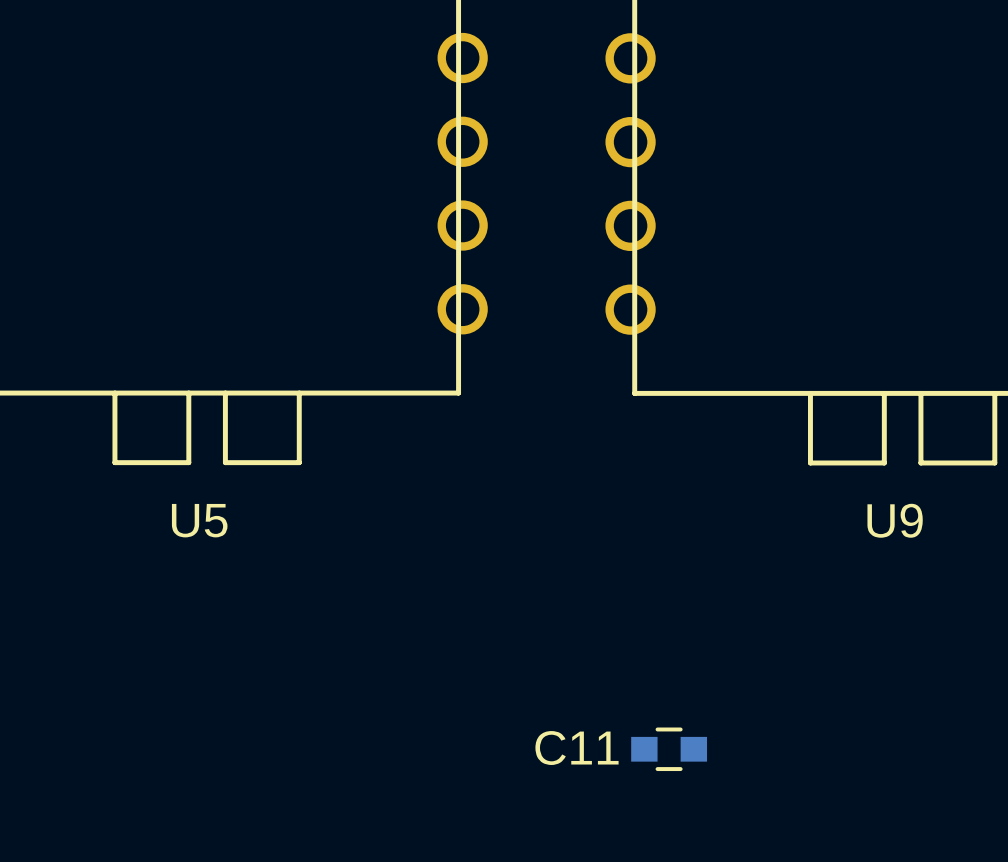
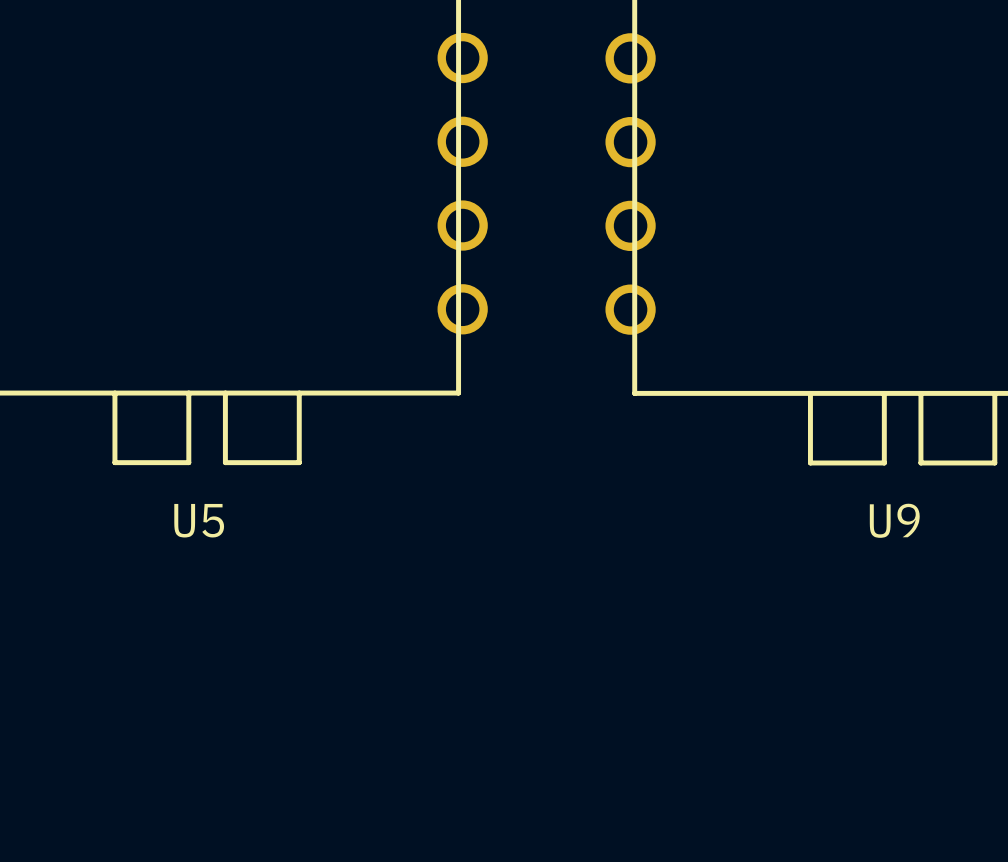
C11: (669, 749) -> none

